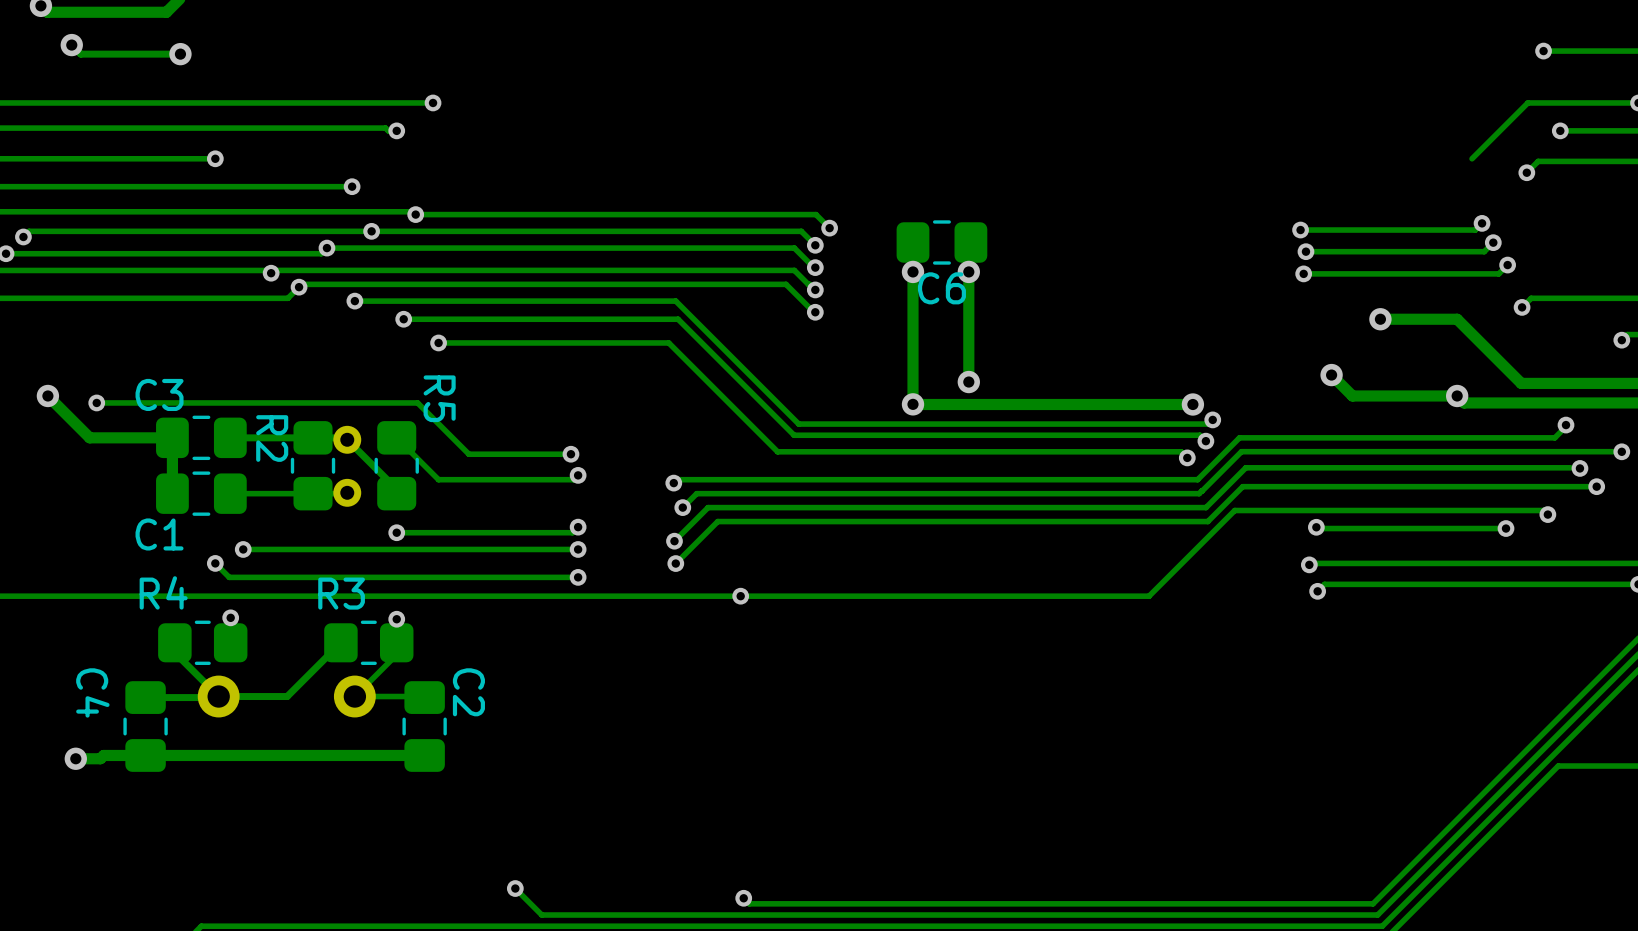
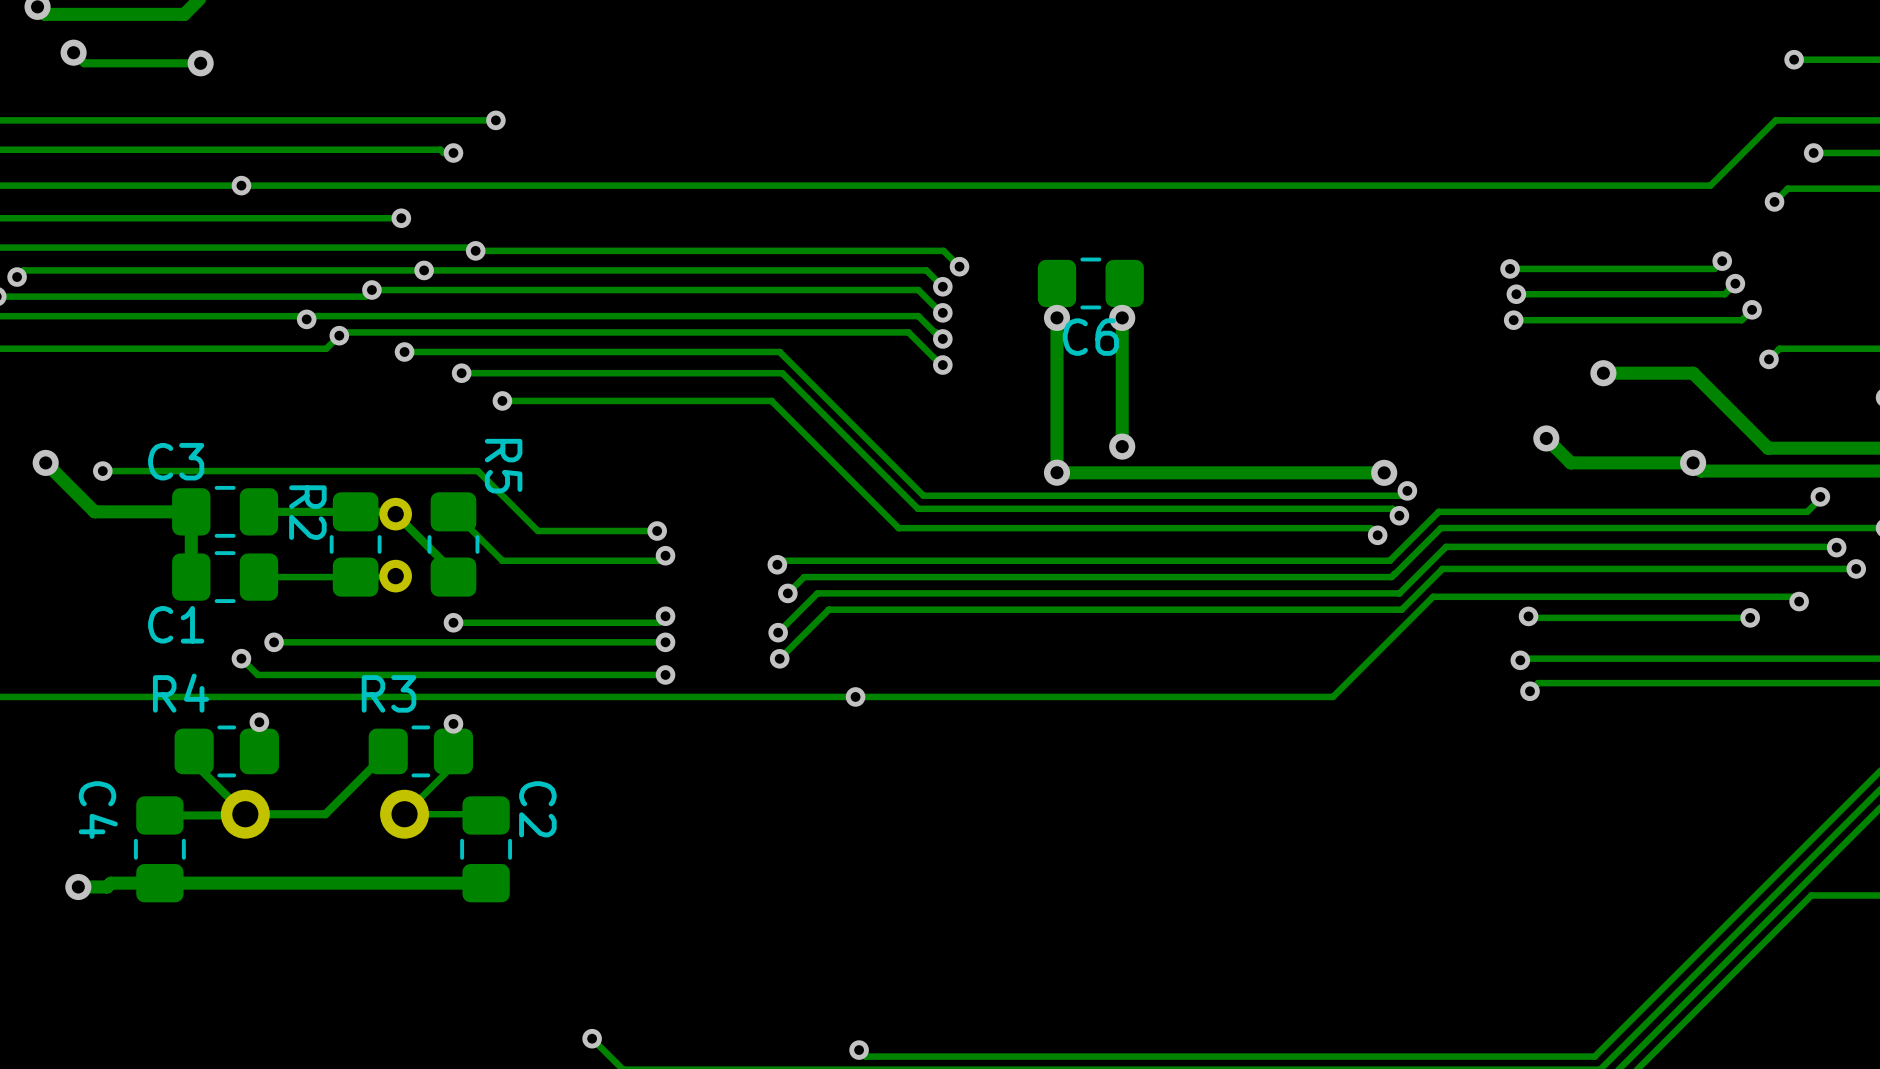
track: none -> (1710, 185) (241, 185)

